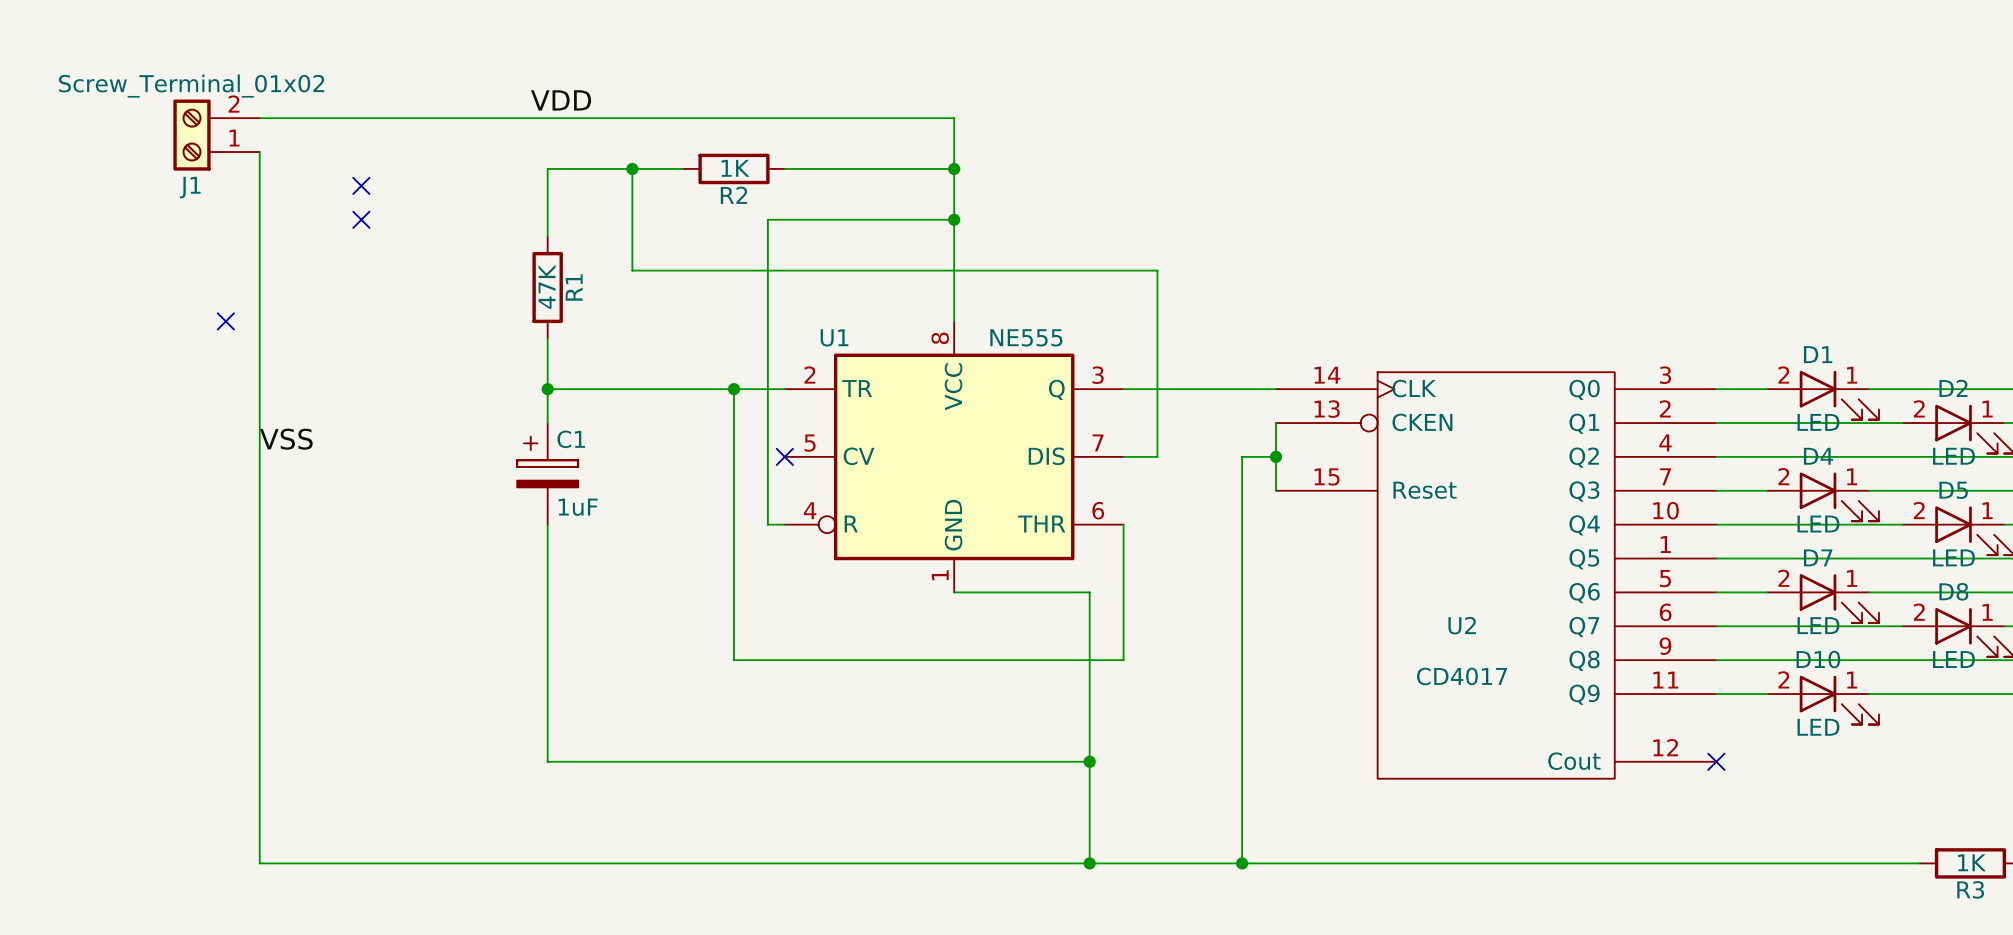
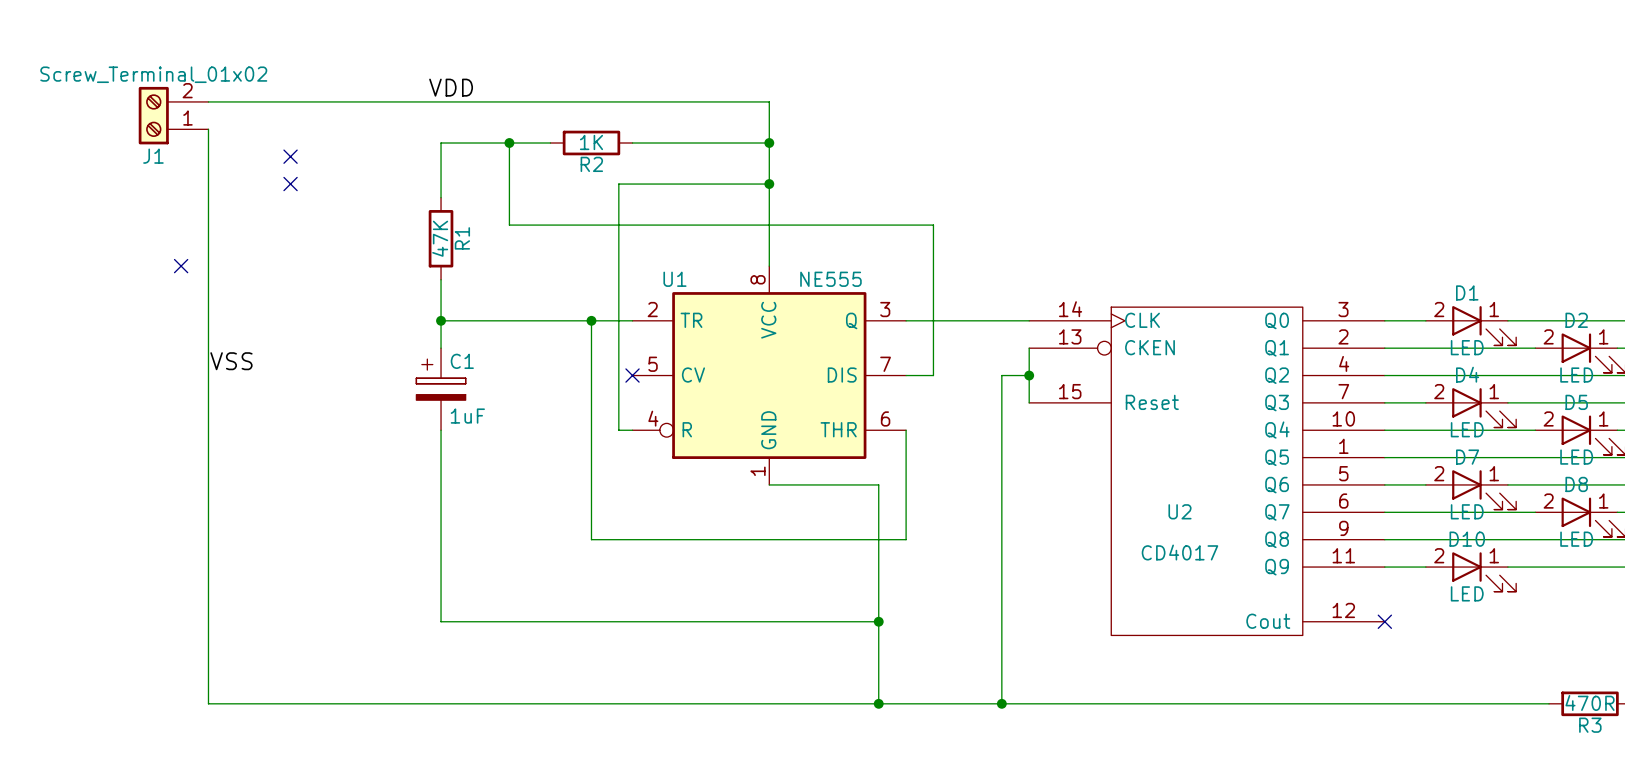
R3 value: 1K (1971, 862) -> 470R (1590, 702)

